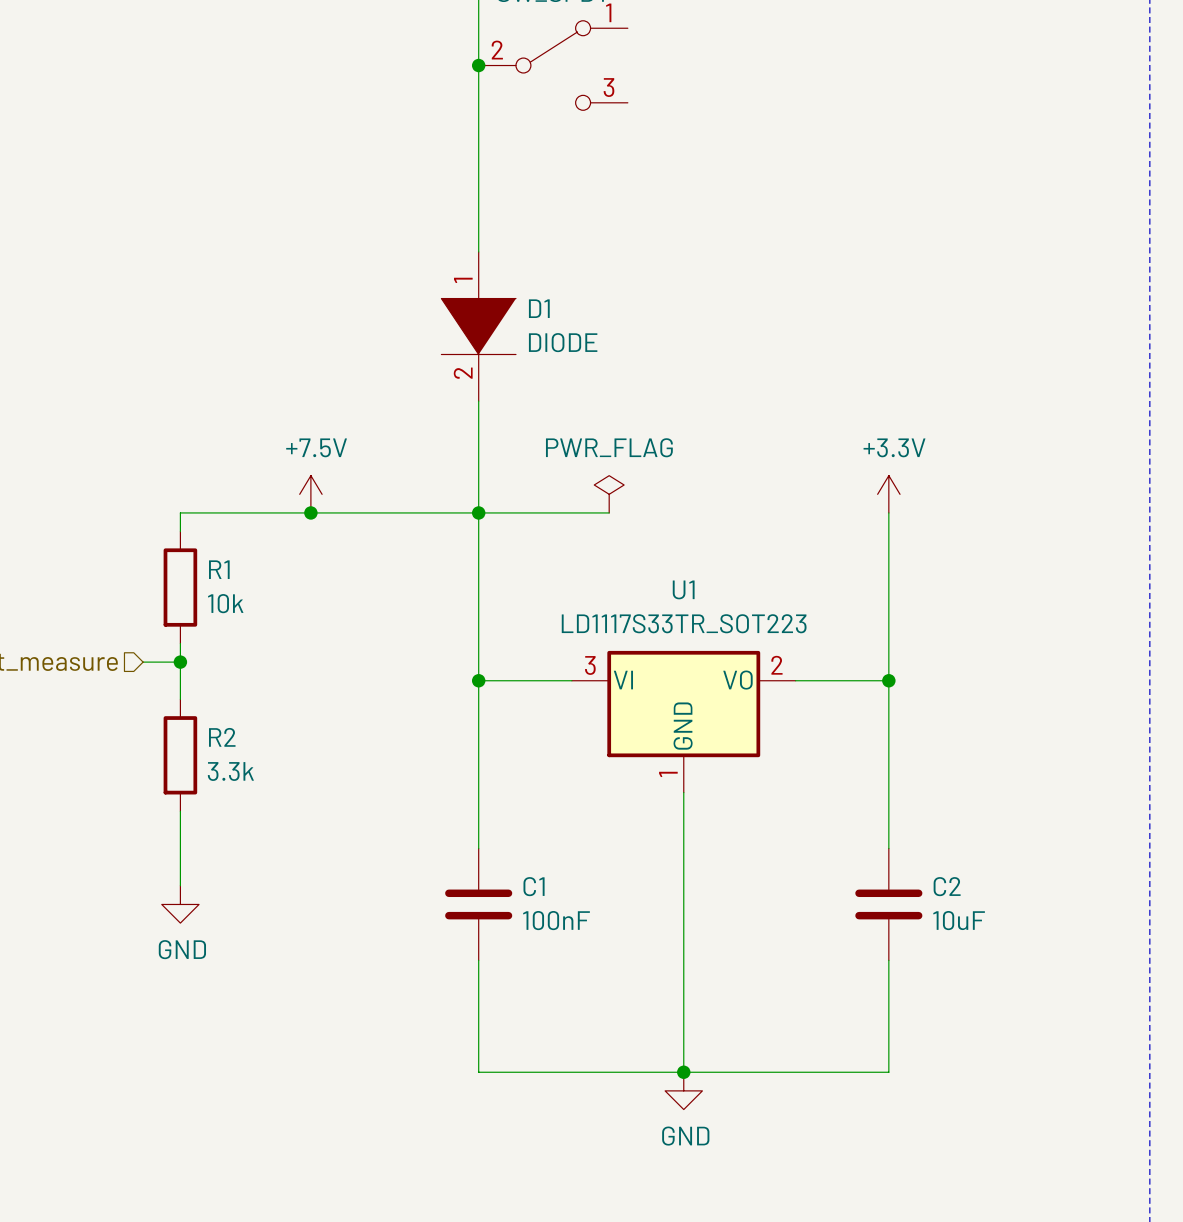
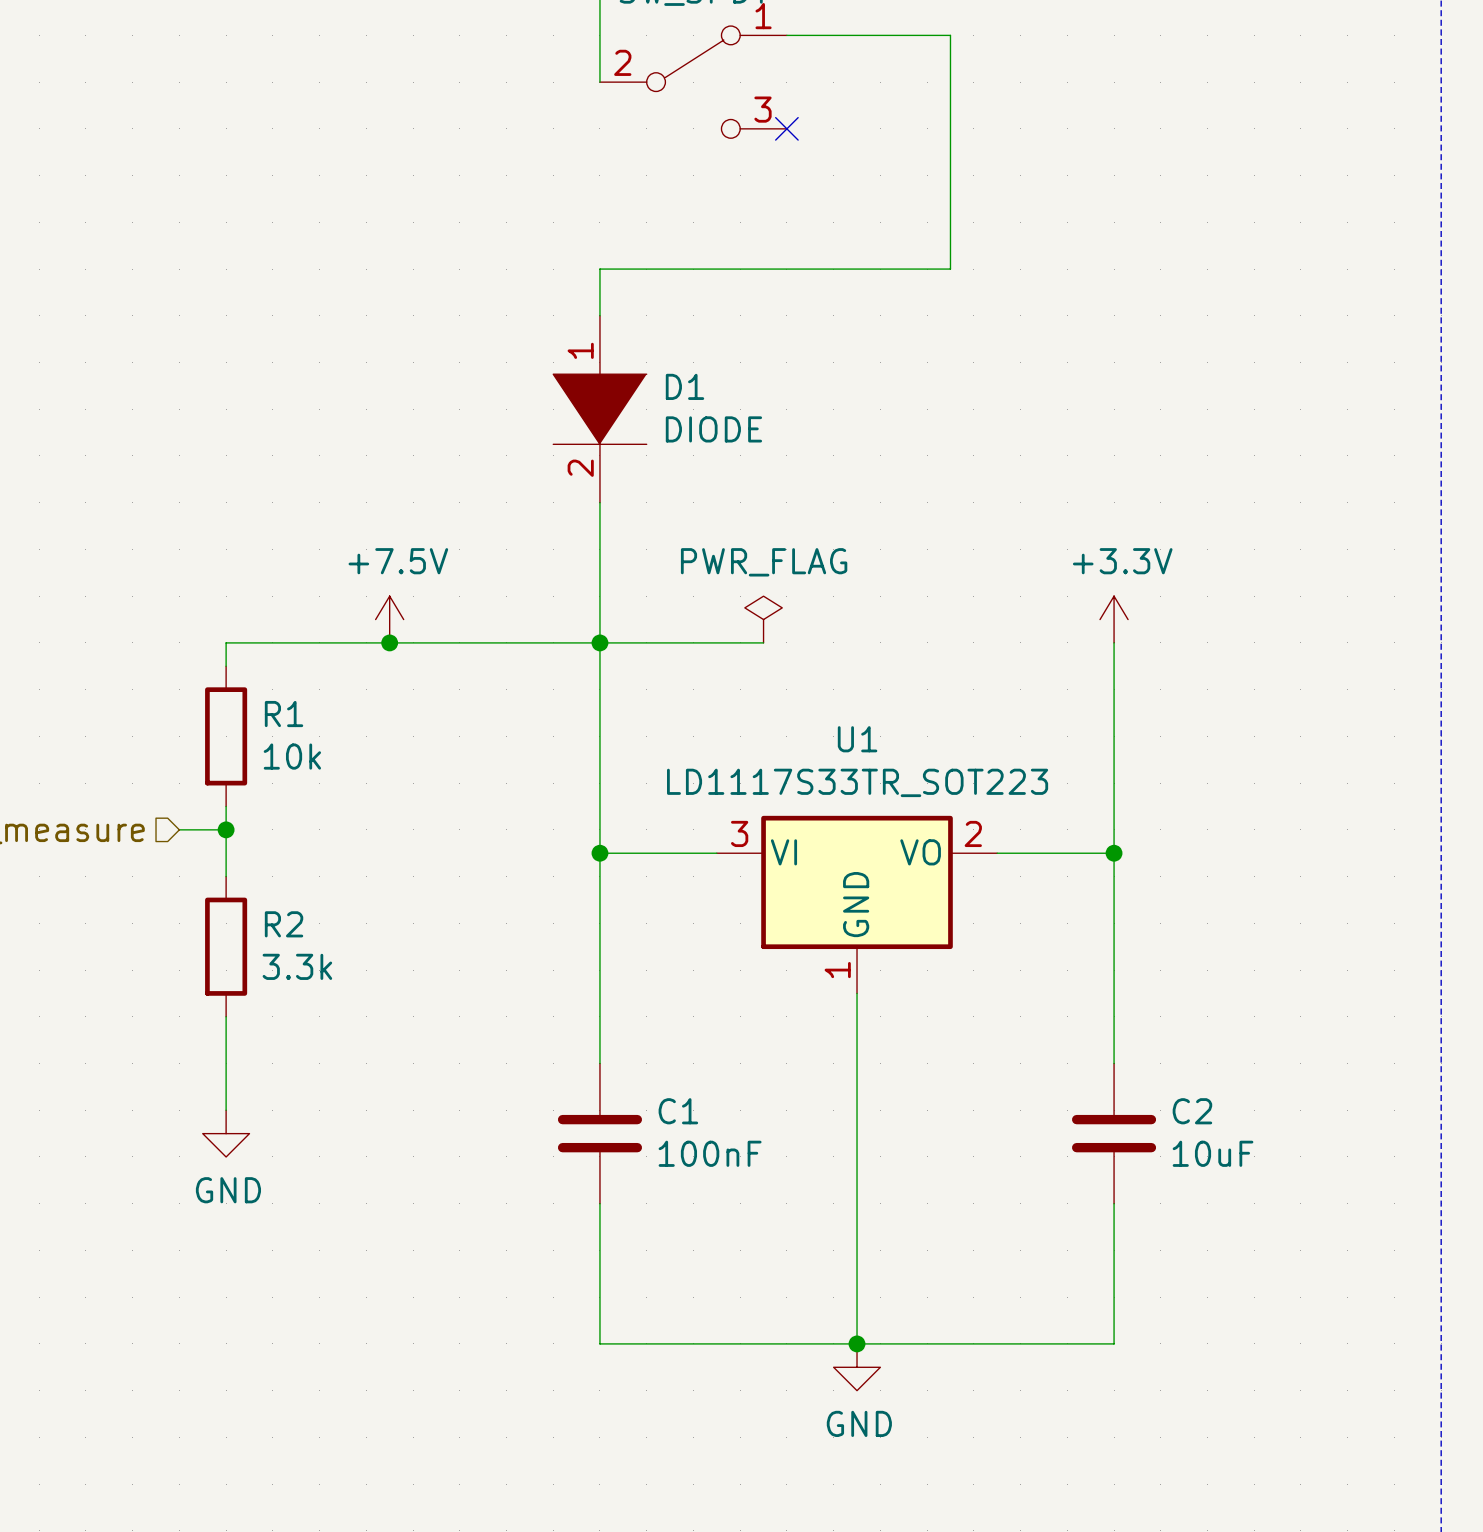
wire: (478, 65) (478, 214) -> (786, 35) (950, 35) (950, 269) (599, 269)
junction: (478, 65) -> none
no-connect mark: none -> (786, 128)

